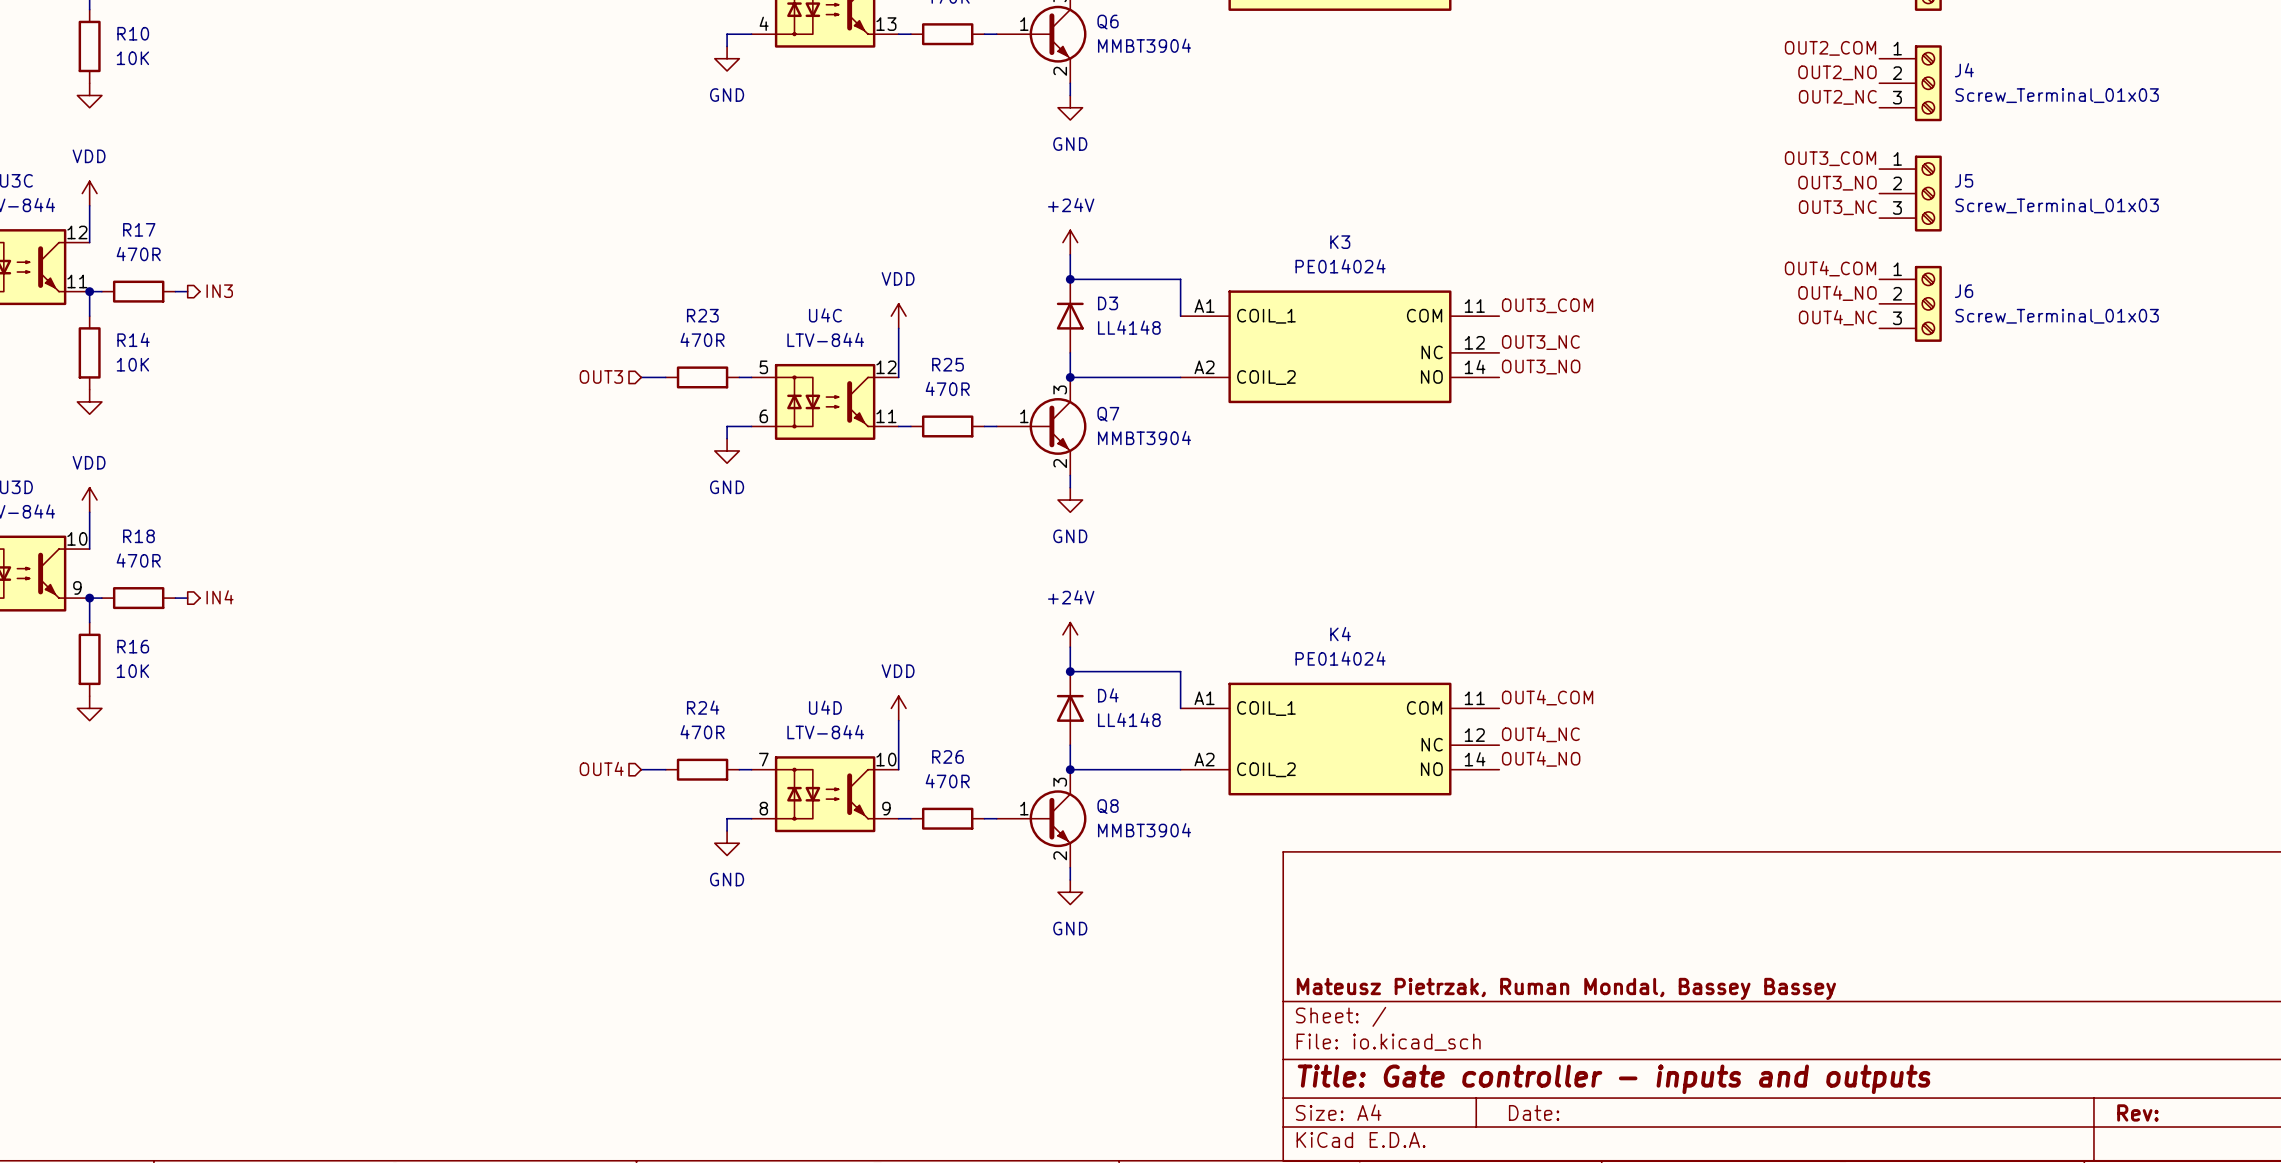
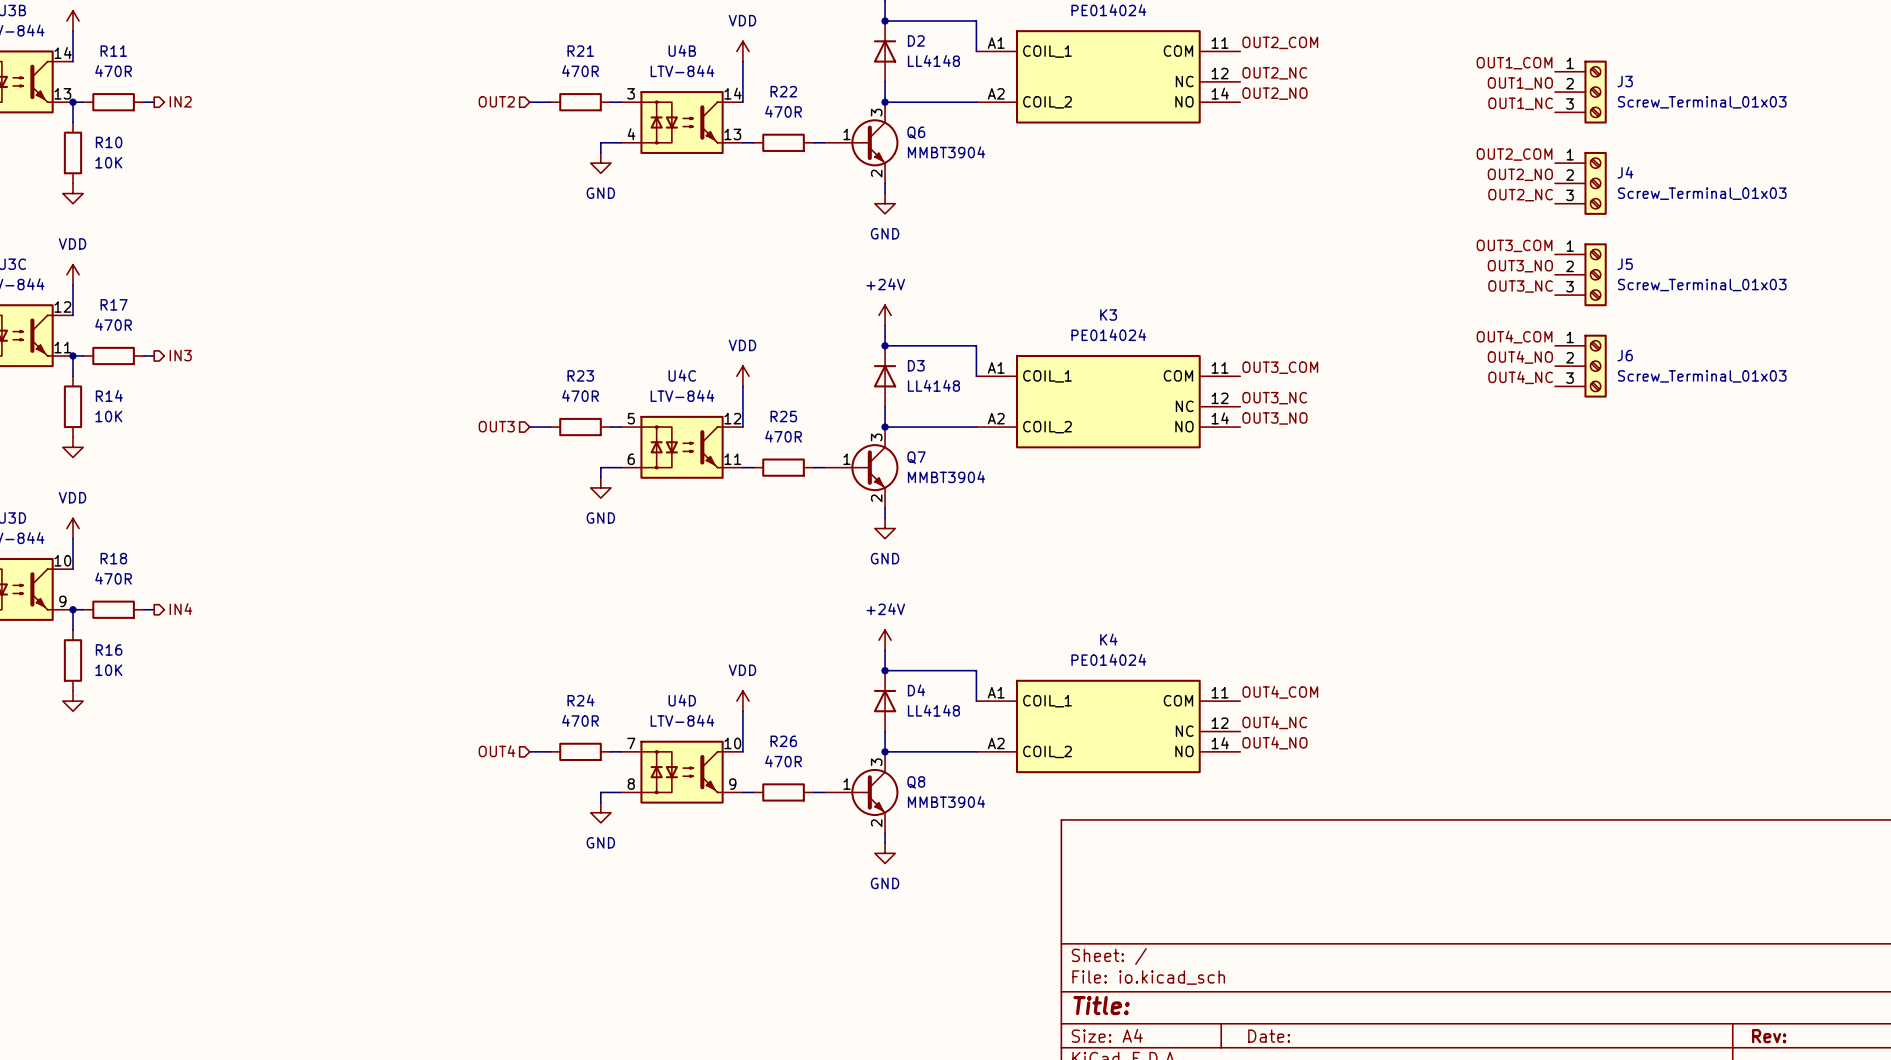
title block: Mateusz Pietrzak, Ruman Mondal, Bassey Bassey (1566, 988) -> none
title block: Title: Gate controller - inputs and outputs (1614, 1079) -> Title: (1101, 1005)

